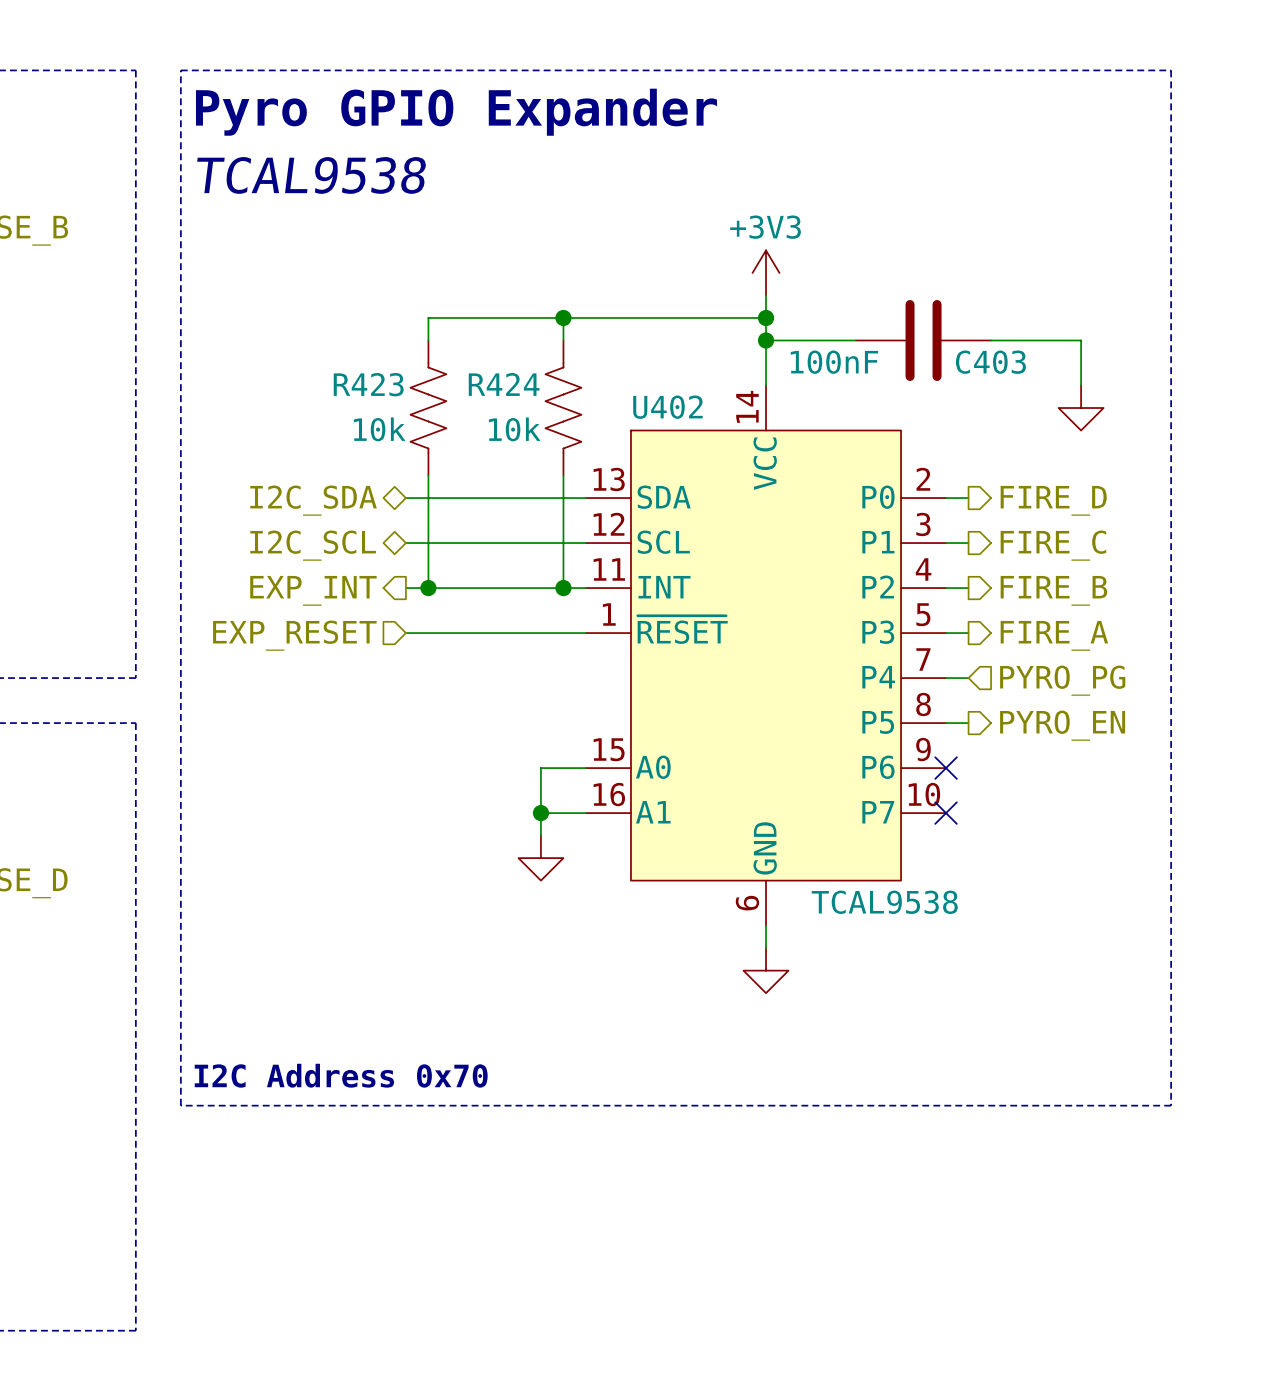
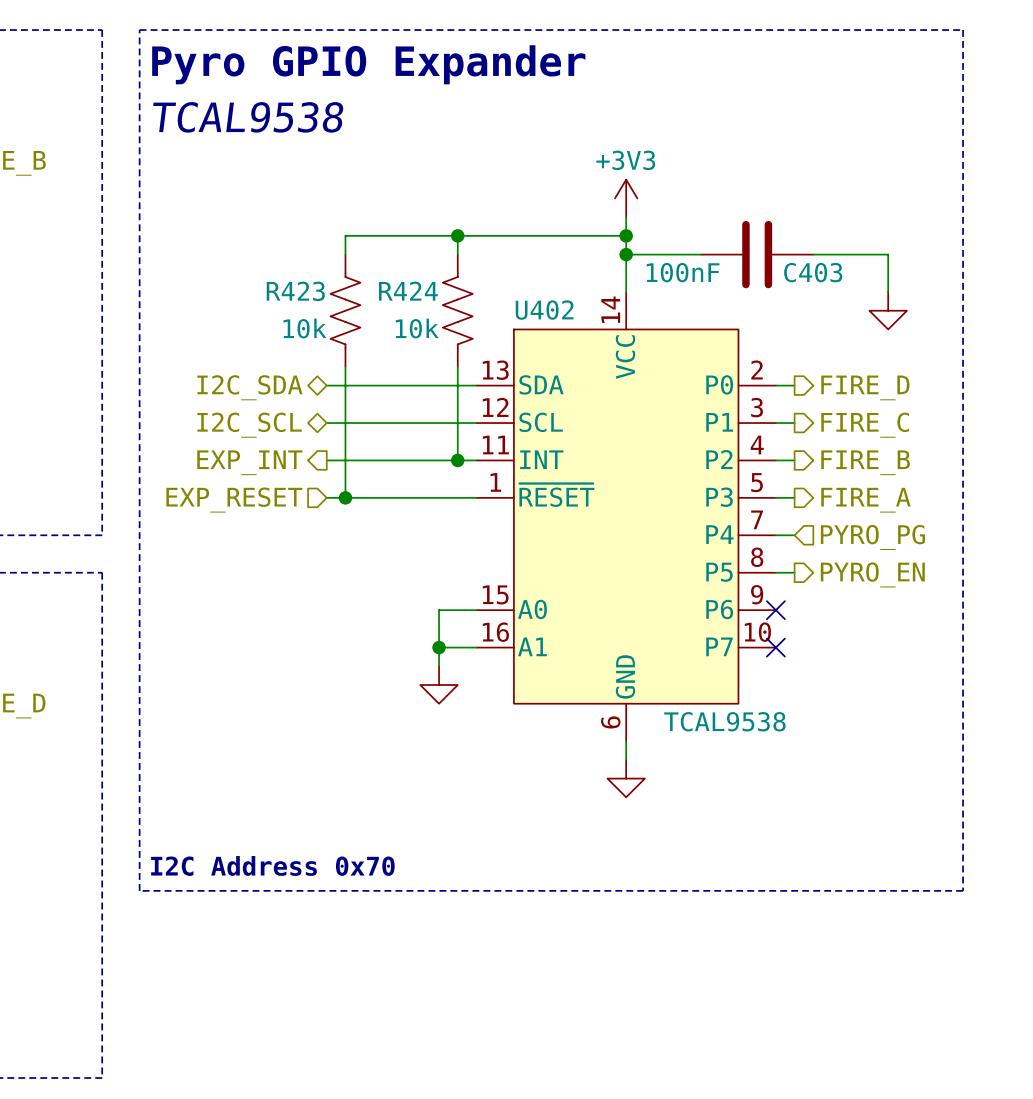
wire: none -> (345, 460) (345, 497)
junction position: (428, 588) -> (345, 497)

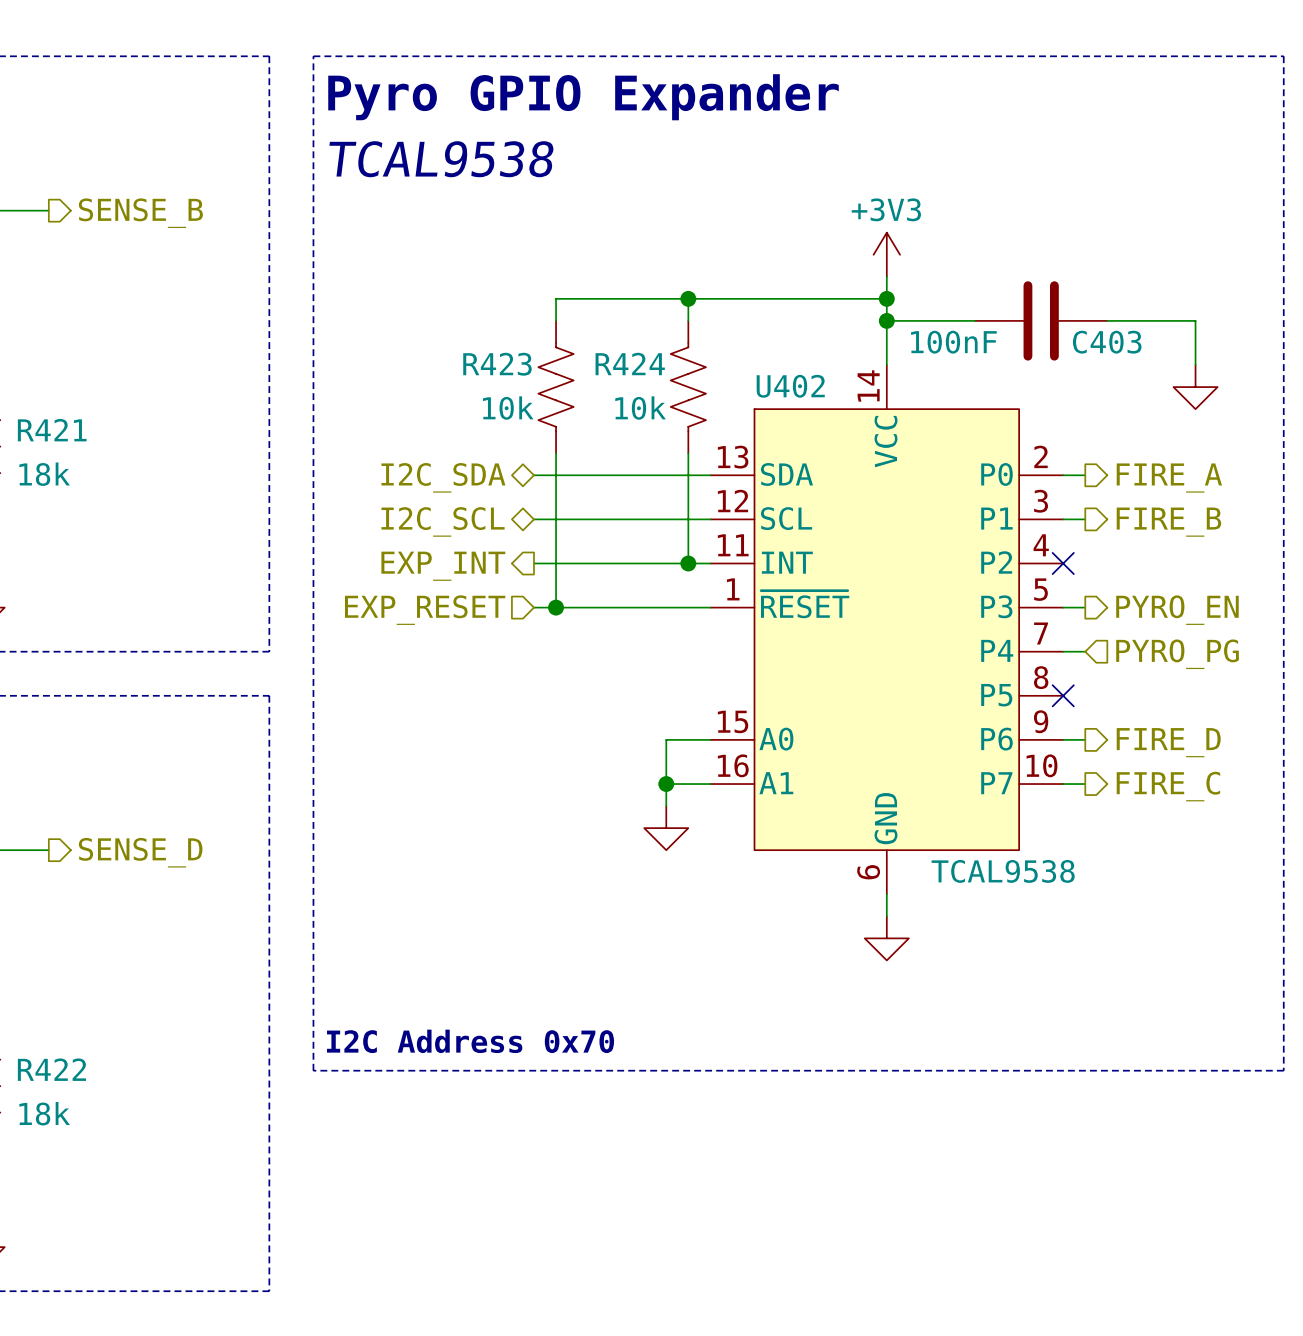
hierarchical label: FIRE_D (865, 387) -> FIRE_A (1169, 478)
hierarchical label: FIRE_C (865, 425) -> FIRE_B (1168, 522)
wire: (775, 460) (794, 460) -> (1063, 784) (1085, 784)
no-connect mark: none -> (1063, 563)
hierarchical label: FIRE_B (865, 462) -> none
hierarchical label: FIRE_A (865, 500) -> PYRO_EN (1177, 610)
wire: (775, 572) (794, 572) -> (1063, 739) (1085, 739)
no-connect mark: none -> (1063, 695)
hierarchical label: PYRO_EN (872, 574) -> none
no-connect mark: (775, 610) -> none
hierarchical label: none -> FIRE_D (1168, 742)
no-connect mark: (775, 647) -> none
hierarchical label: none -> FIRE_C (1168, 786)

